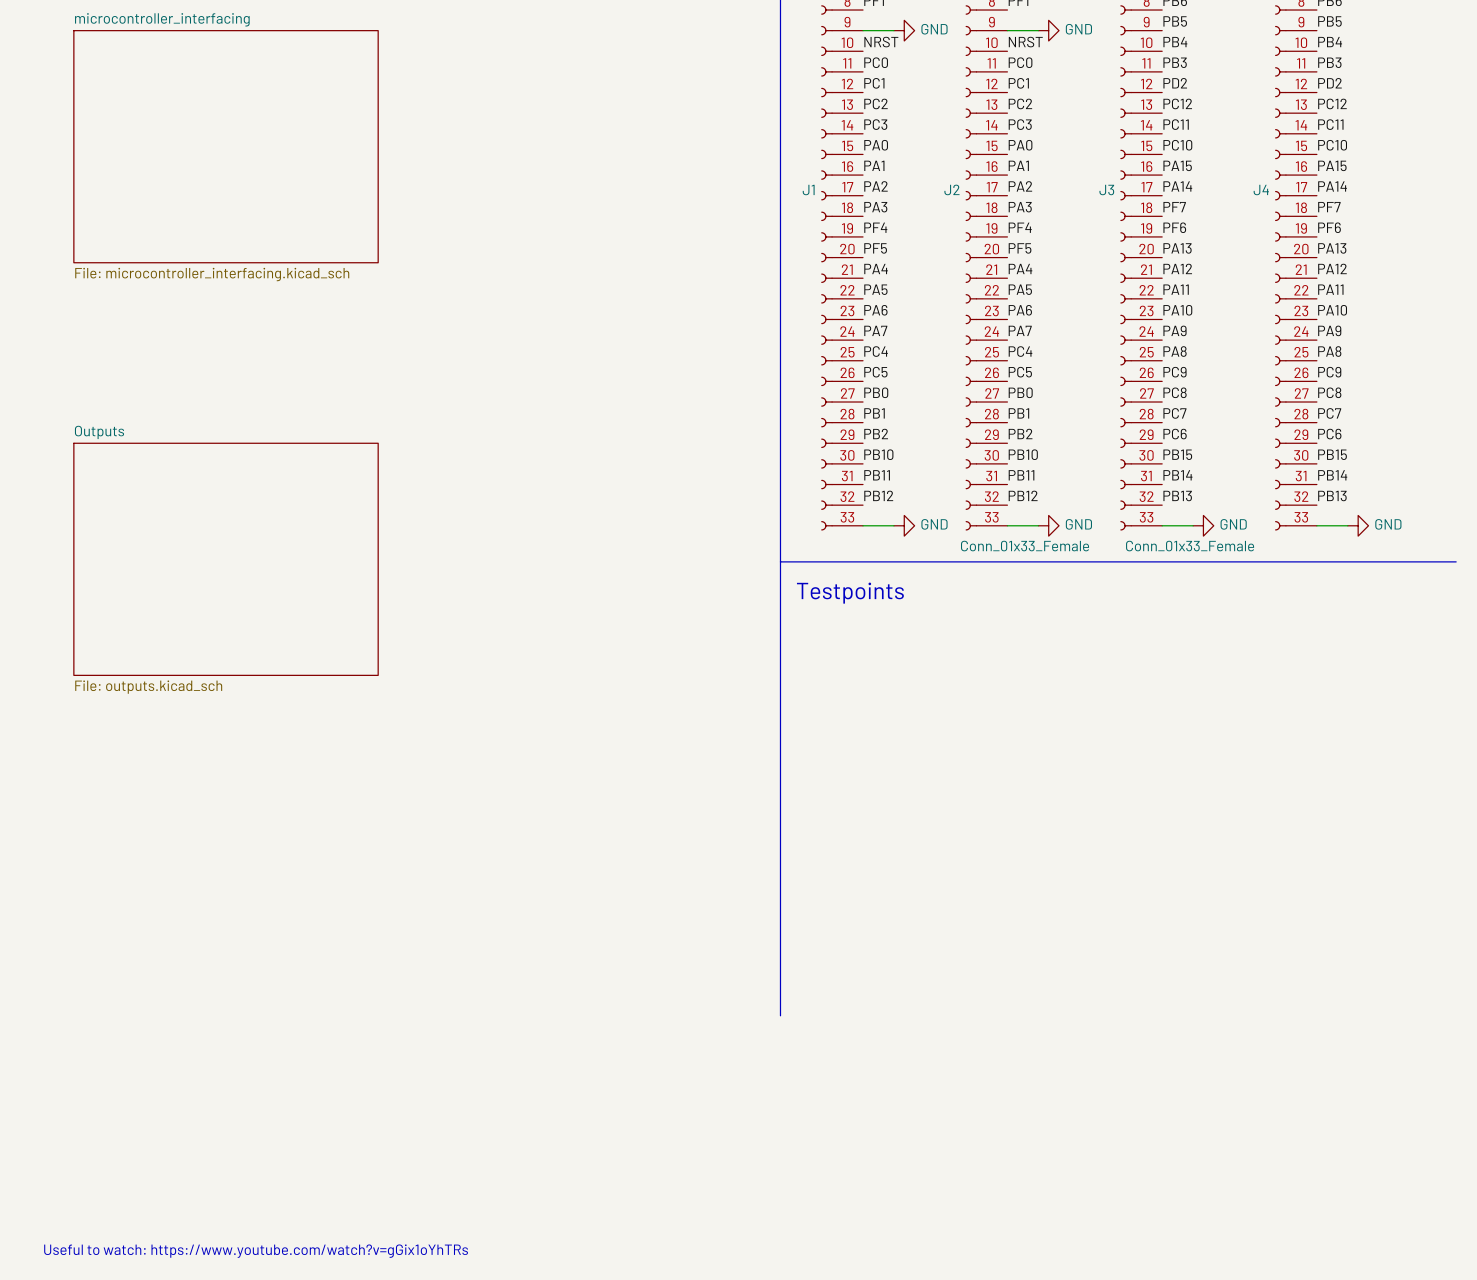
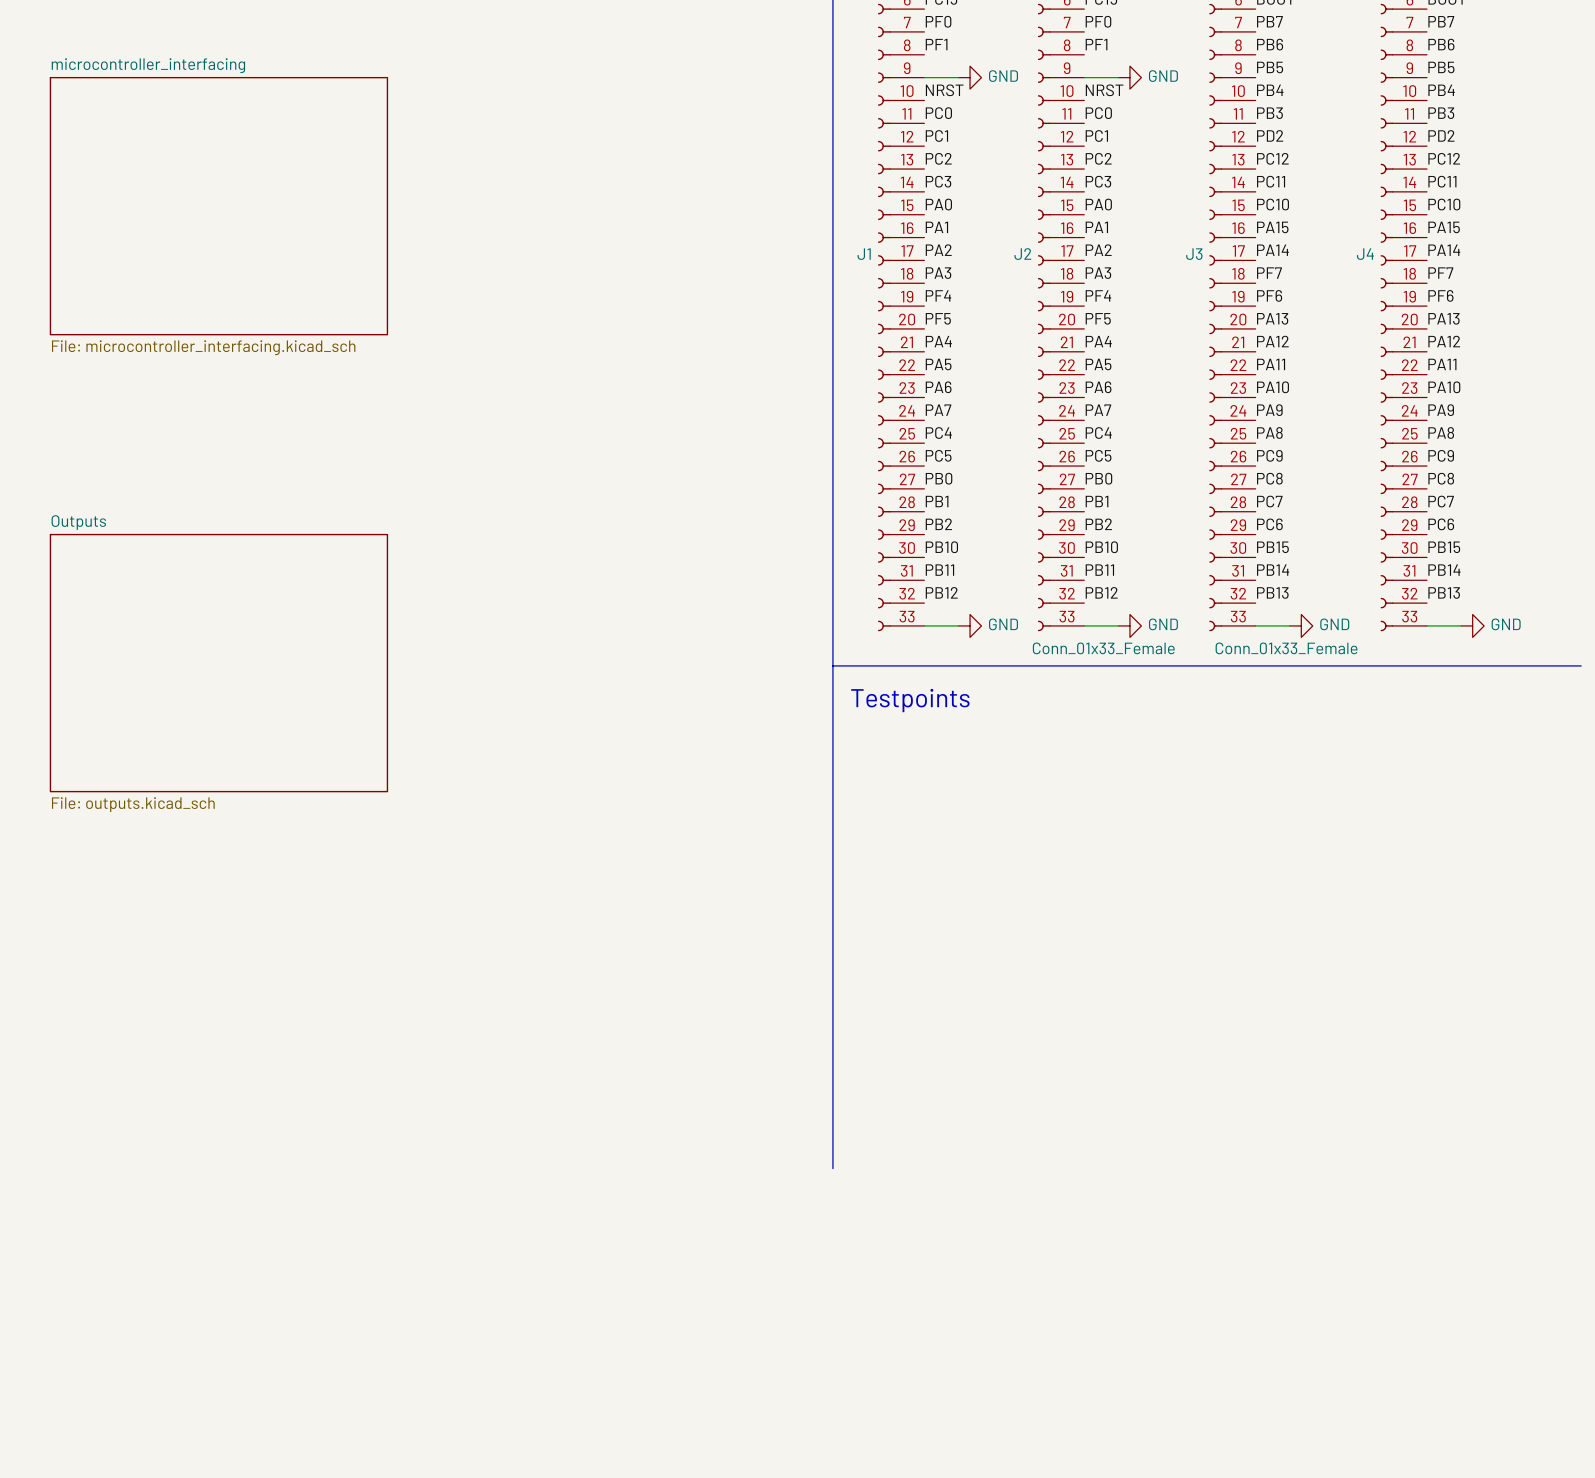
text: Useful to watch: https://www.youtube.com/watch?v=gGix1oYhTRs (256, 1251) -> none

